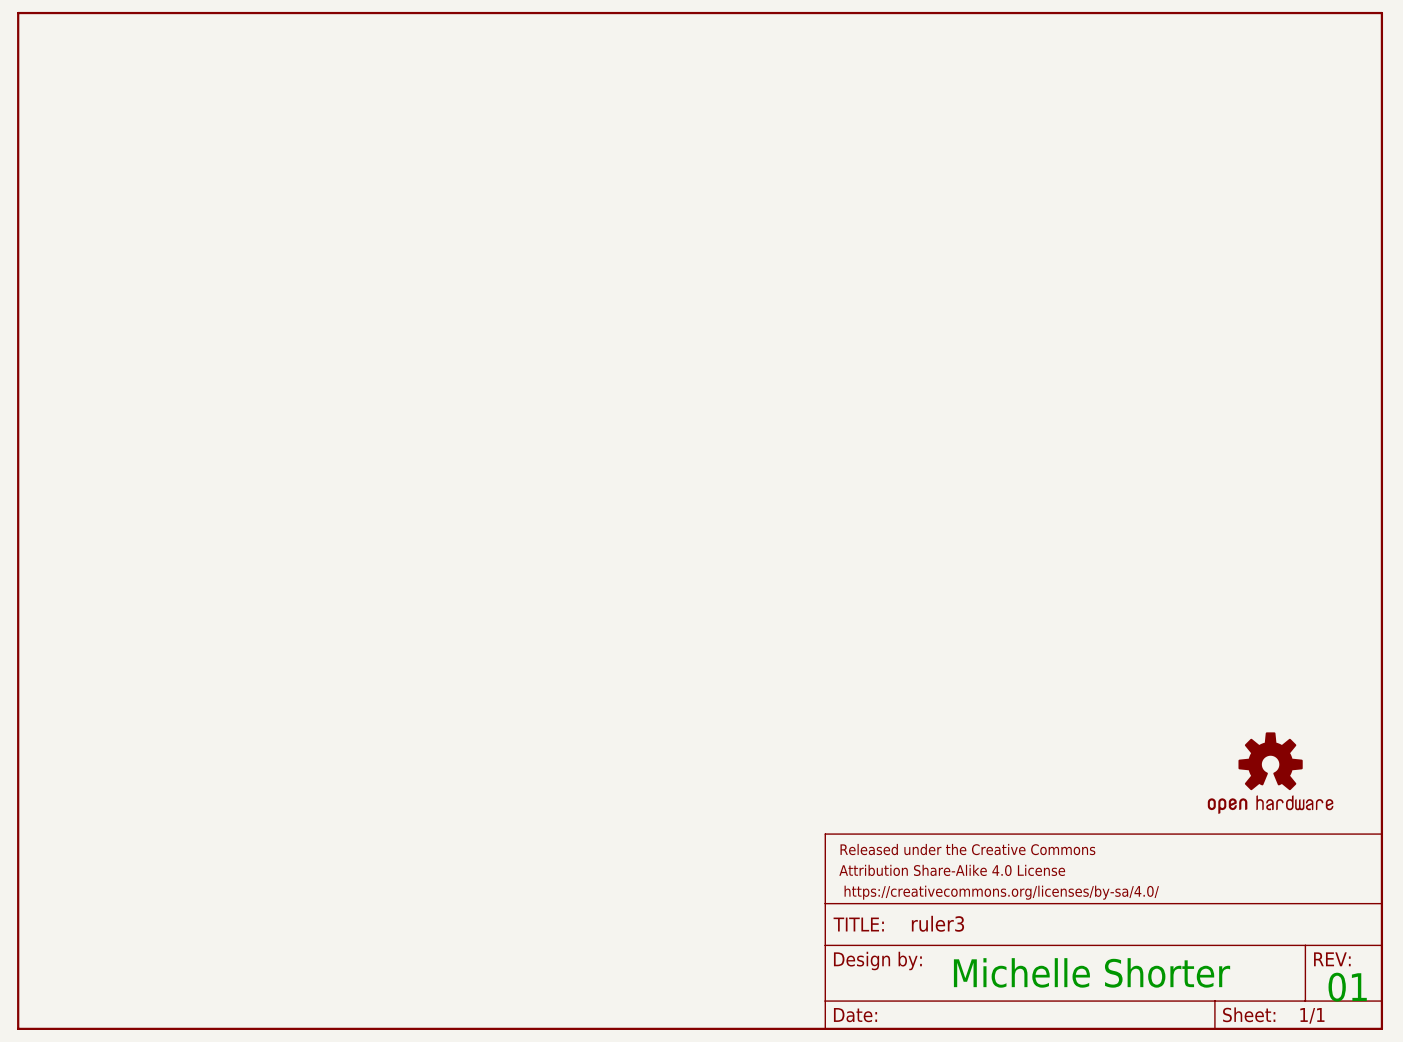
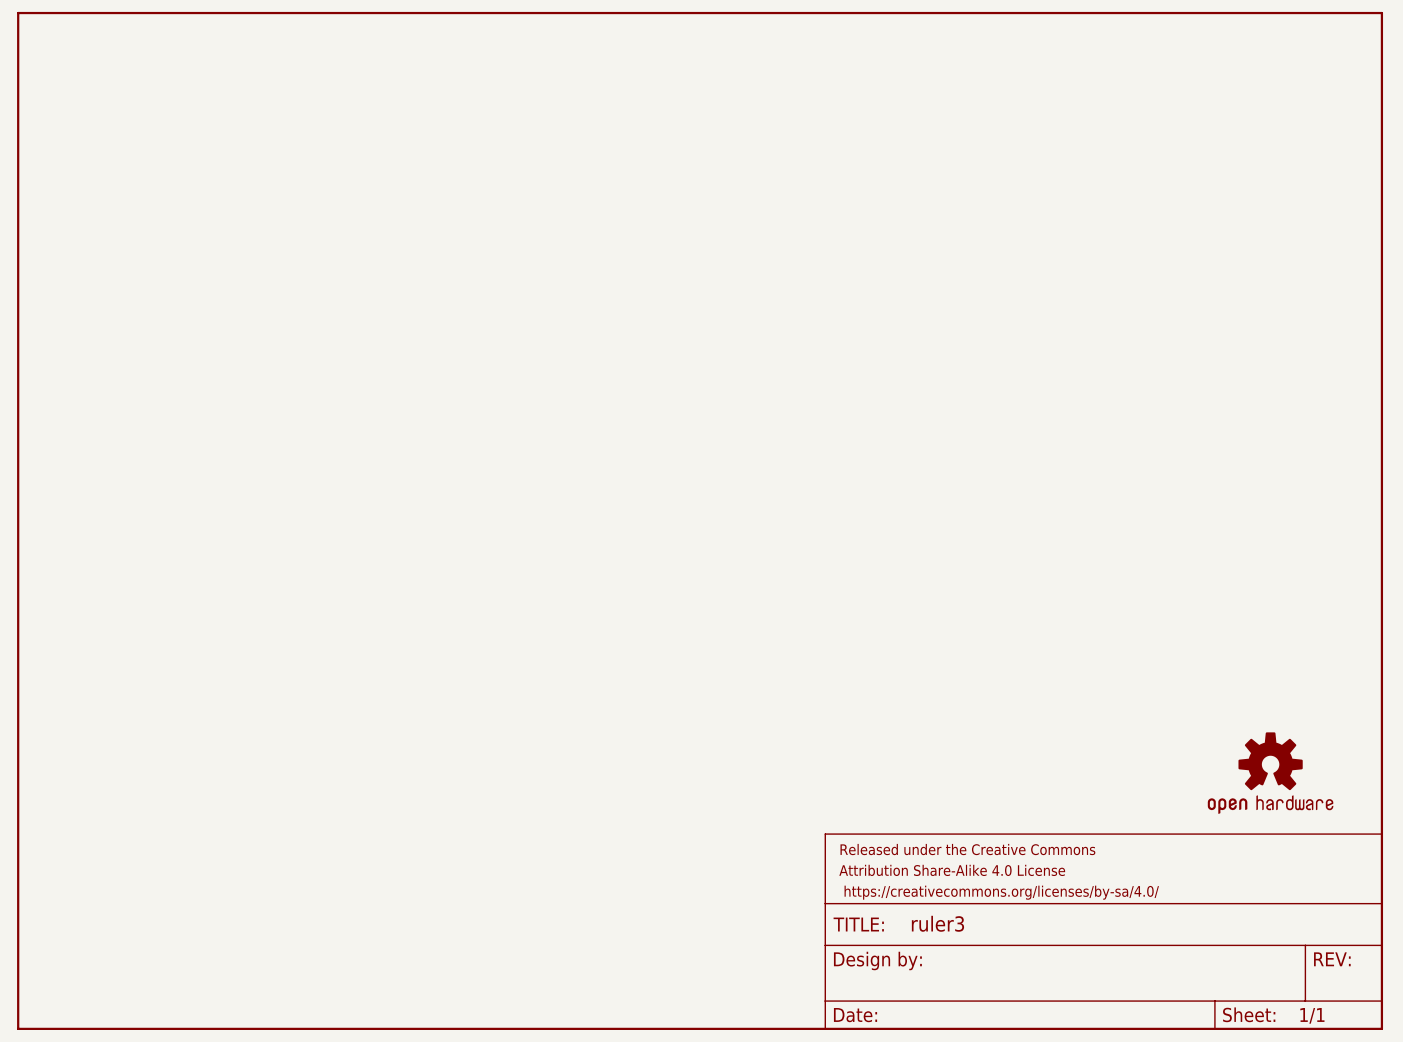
text: Michelle Shorter (1092, 972) -> none
text: 01 (1347, 987) -> none

